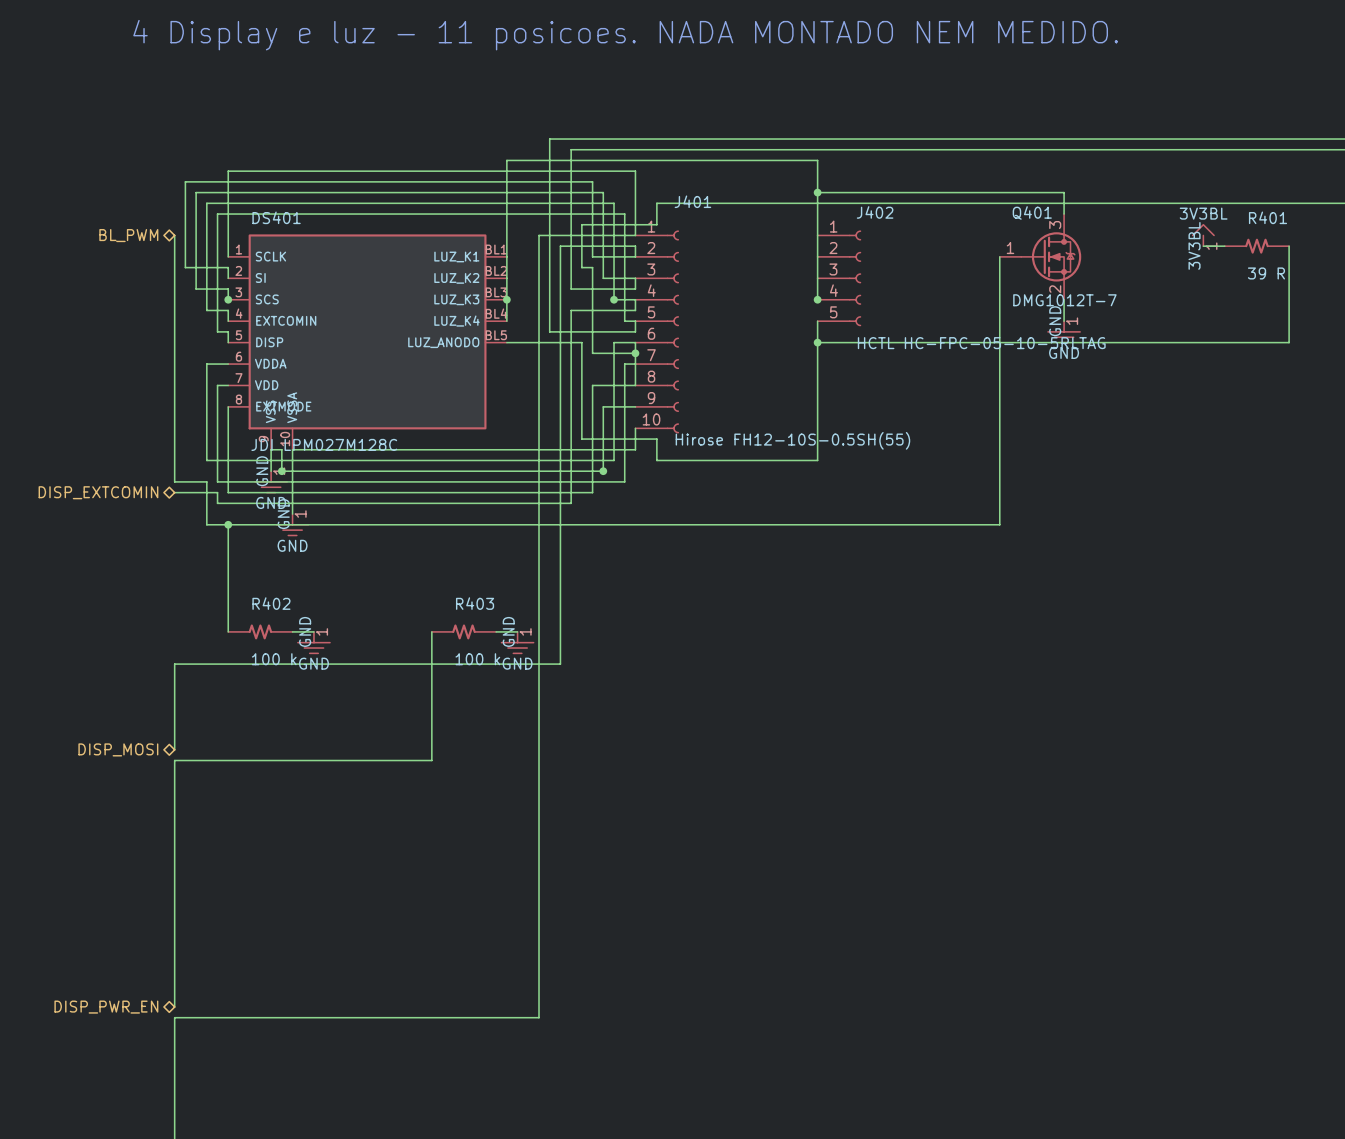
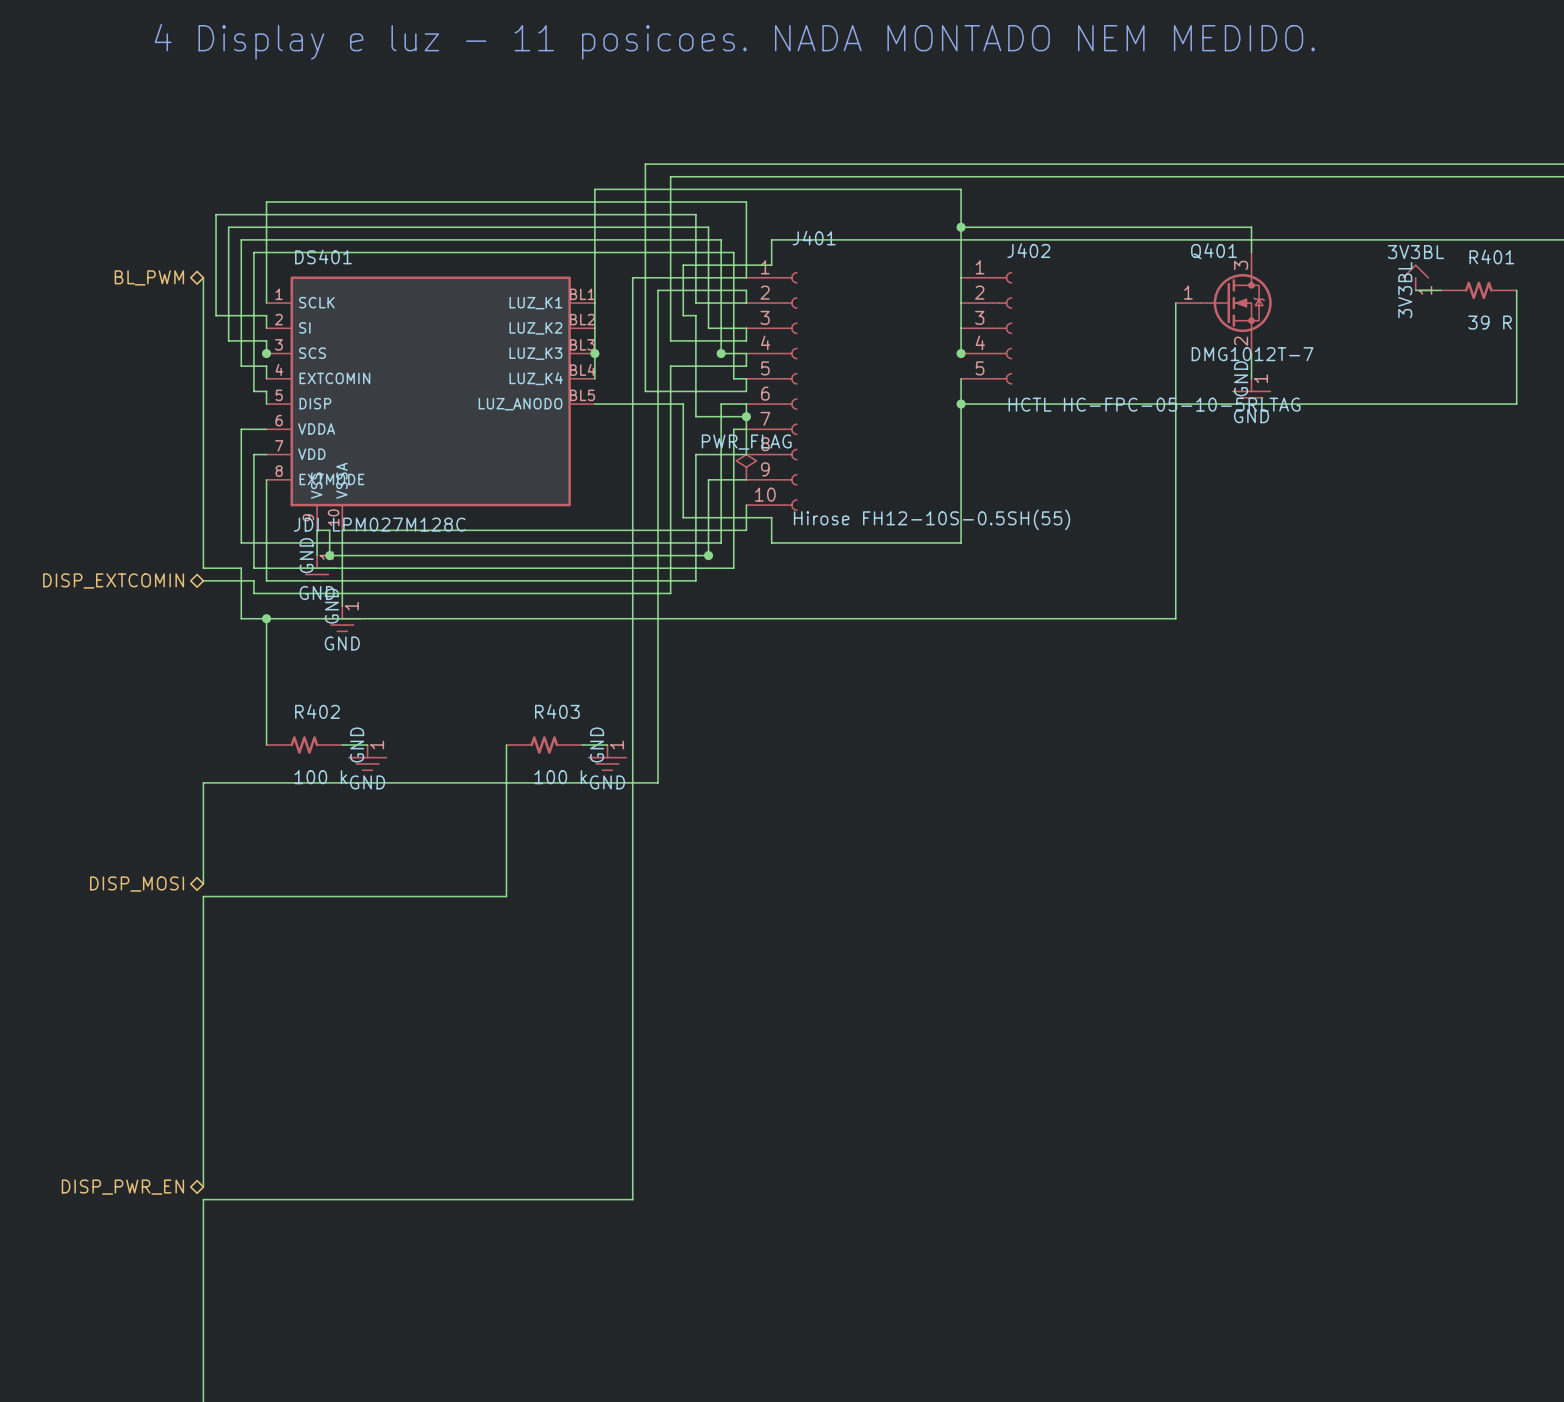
power symbol: none -> PWR_FLAG (746, 467)

